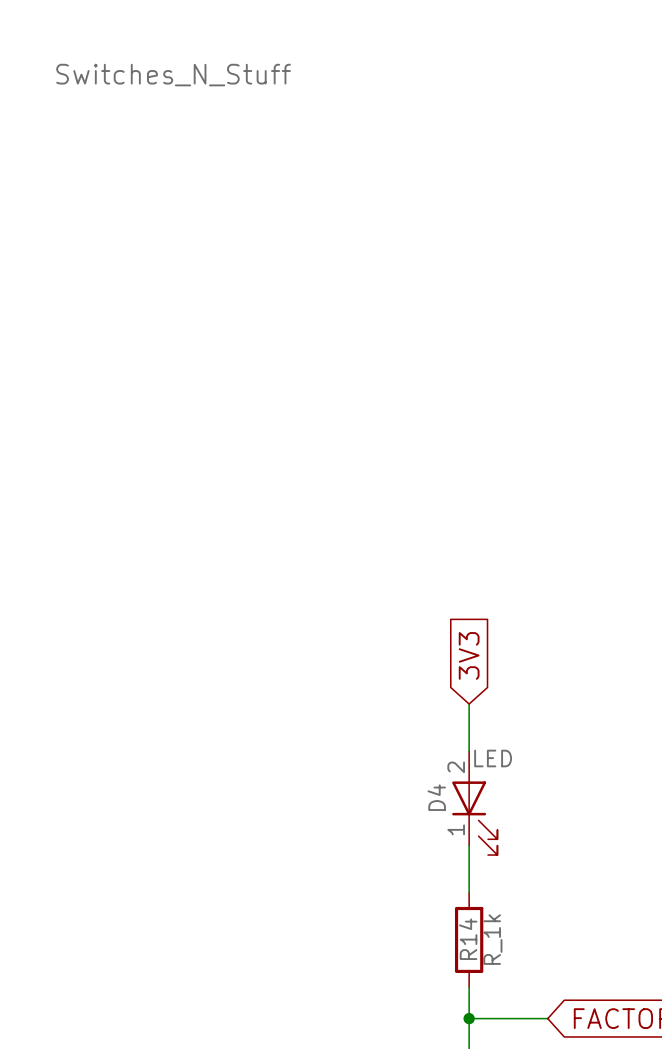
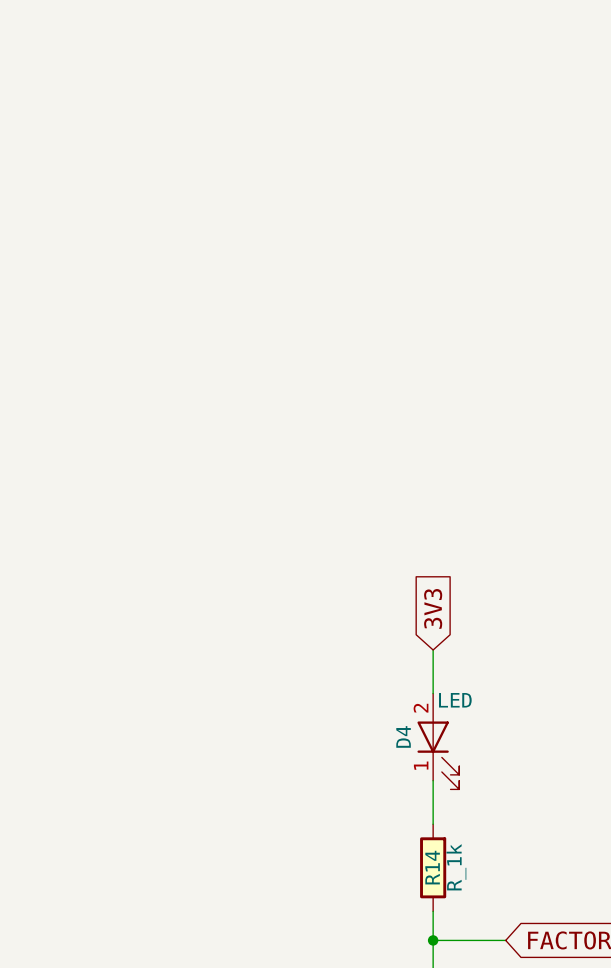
label: Switches_N_Stuff (173, 75) -> none

